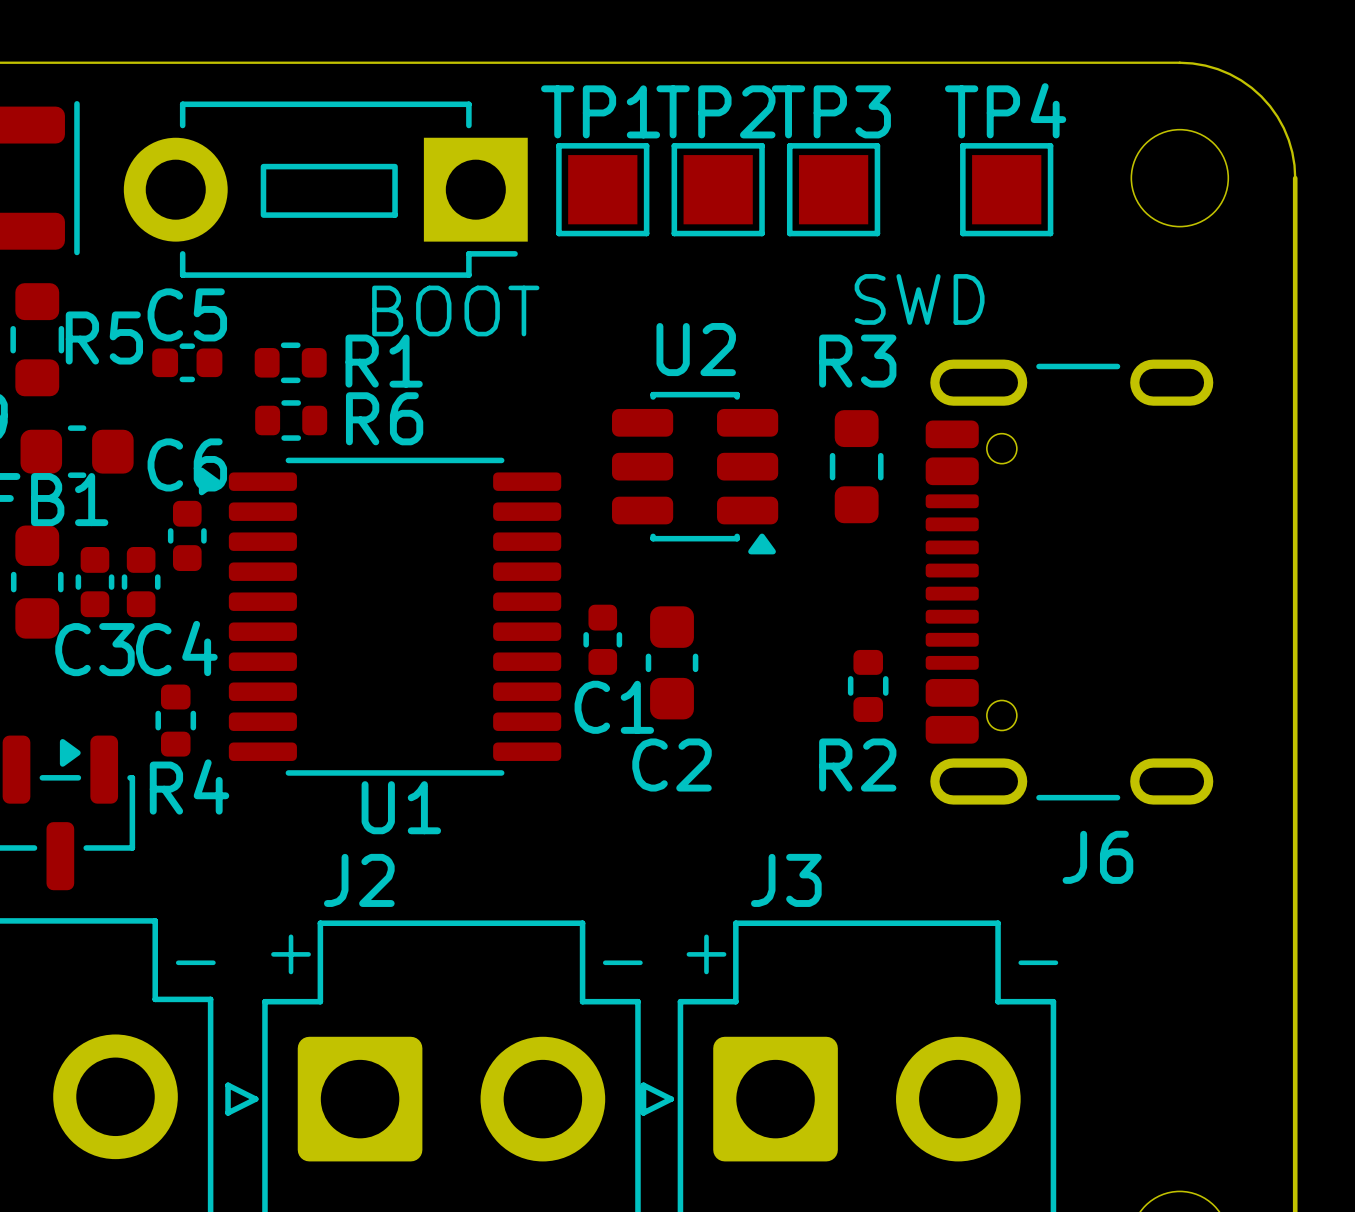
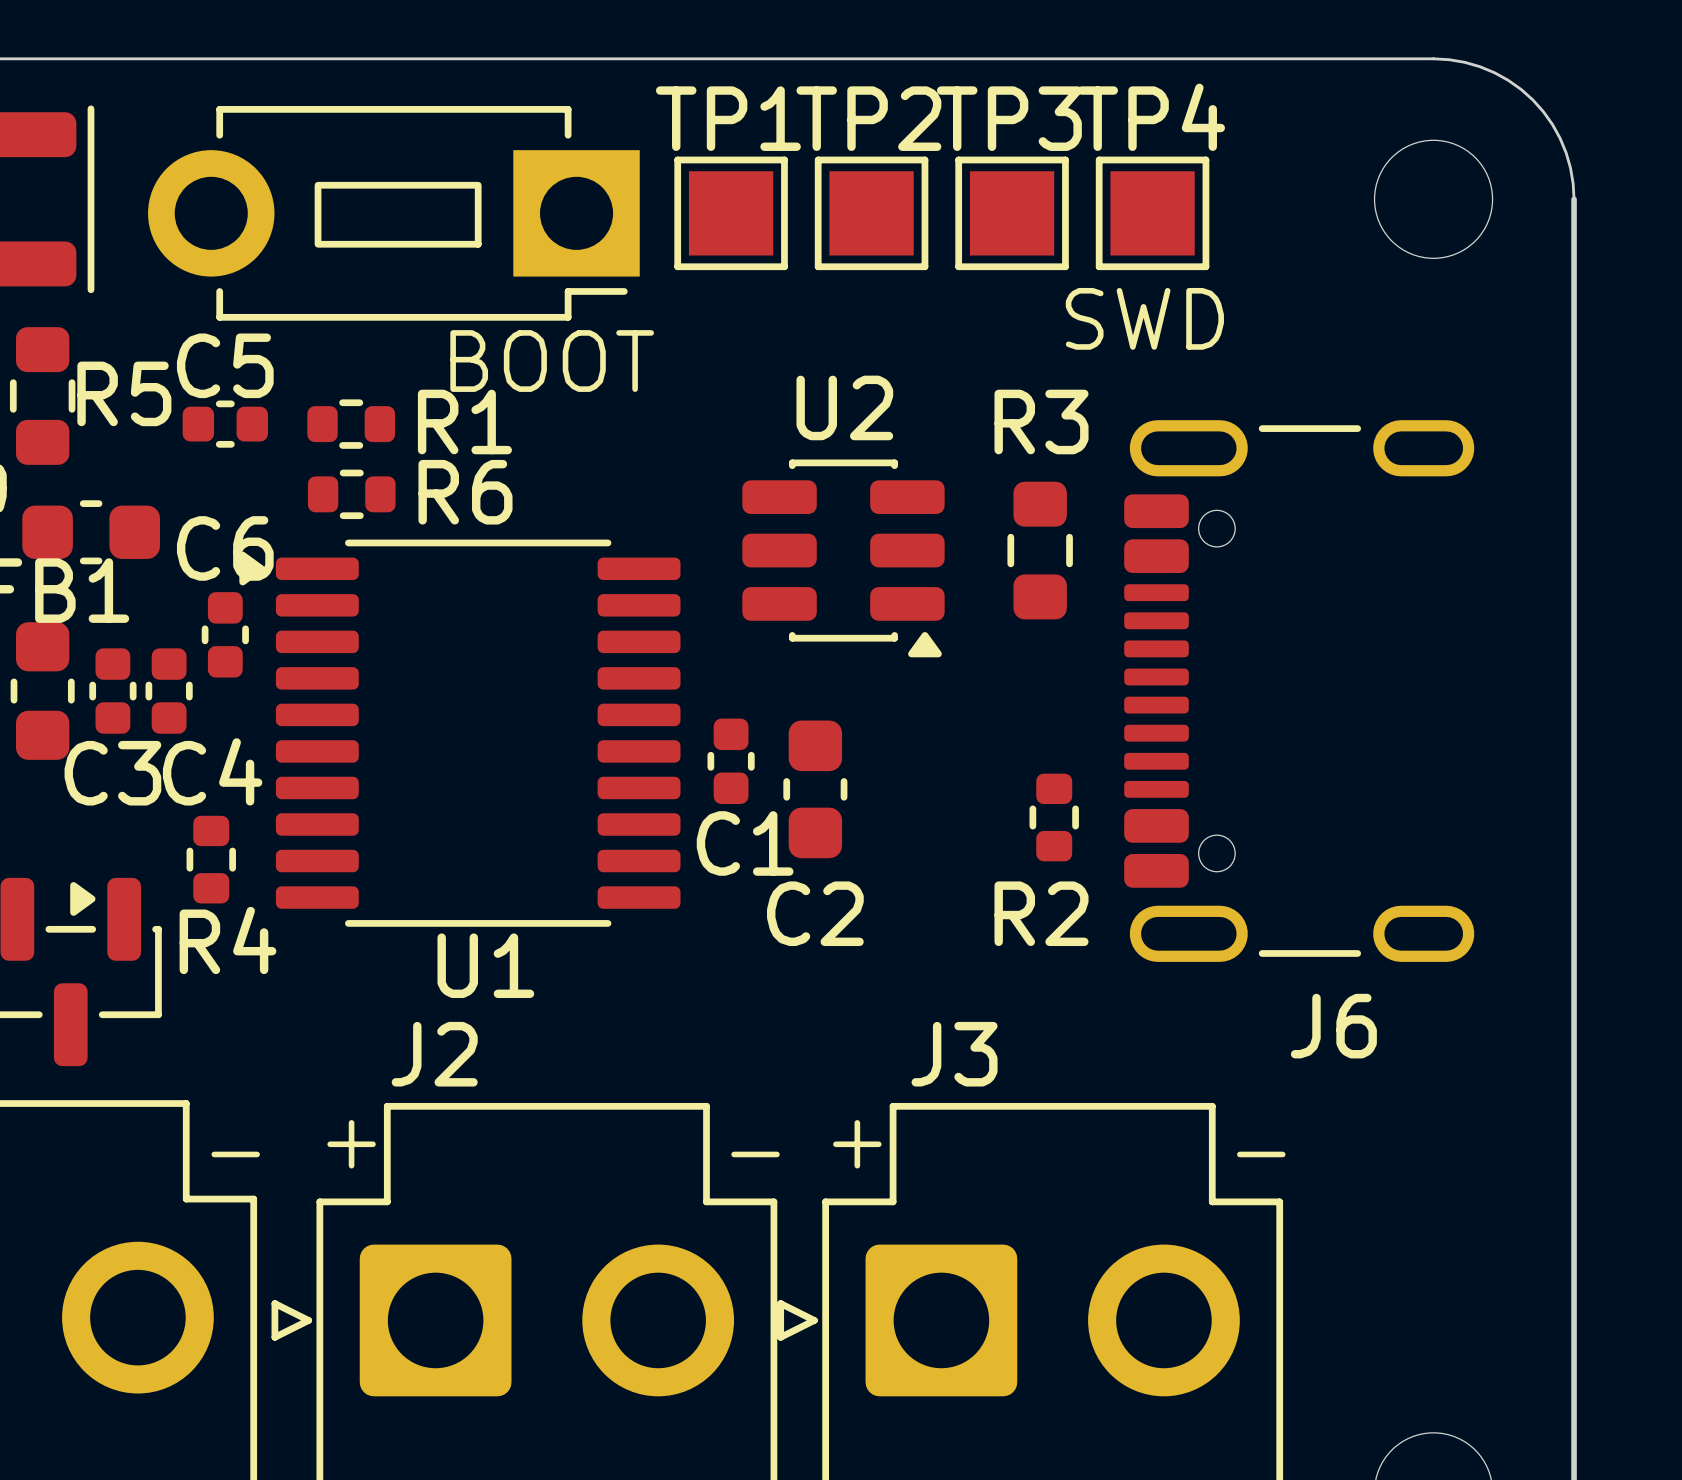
TP4 position: (1006, 189) -> (1152, 213)
text position: SWD (919, 299) -> SWD (1144, 318)

